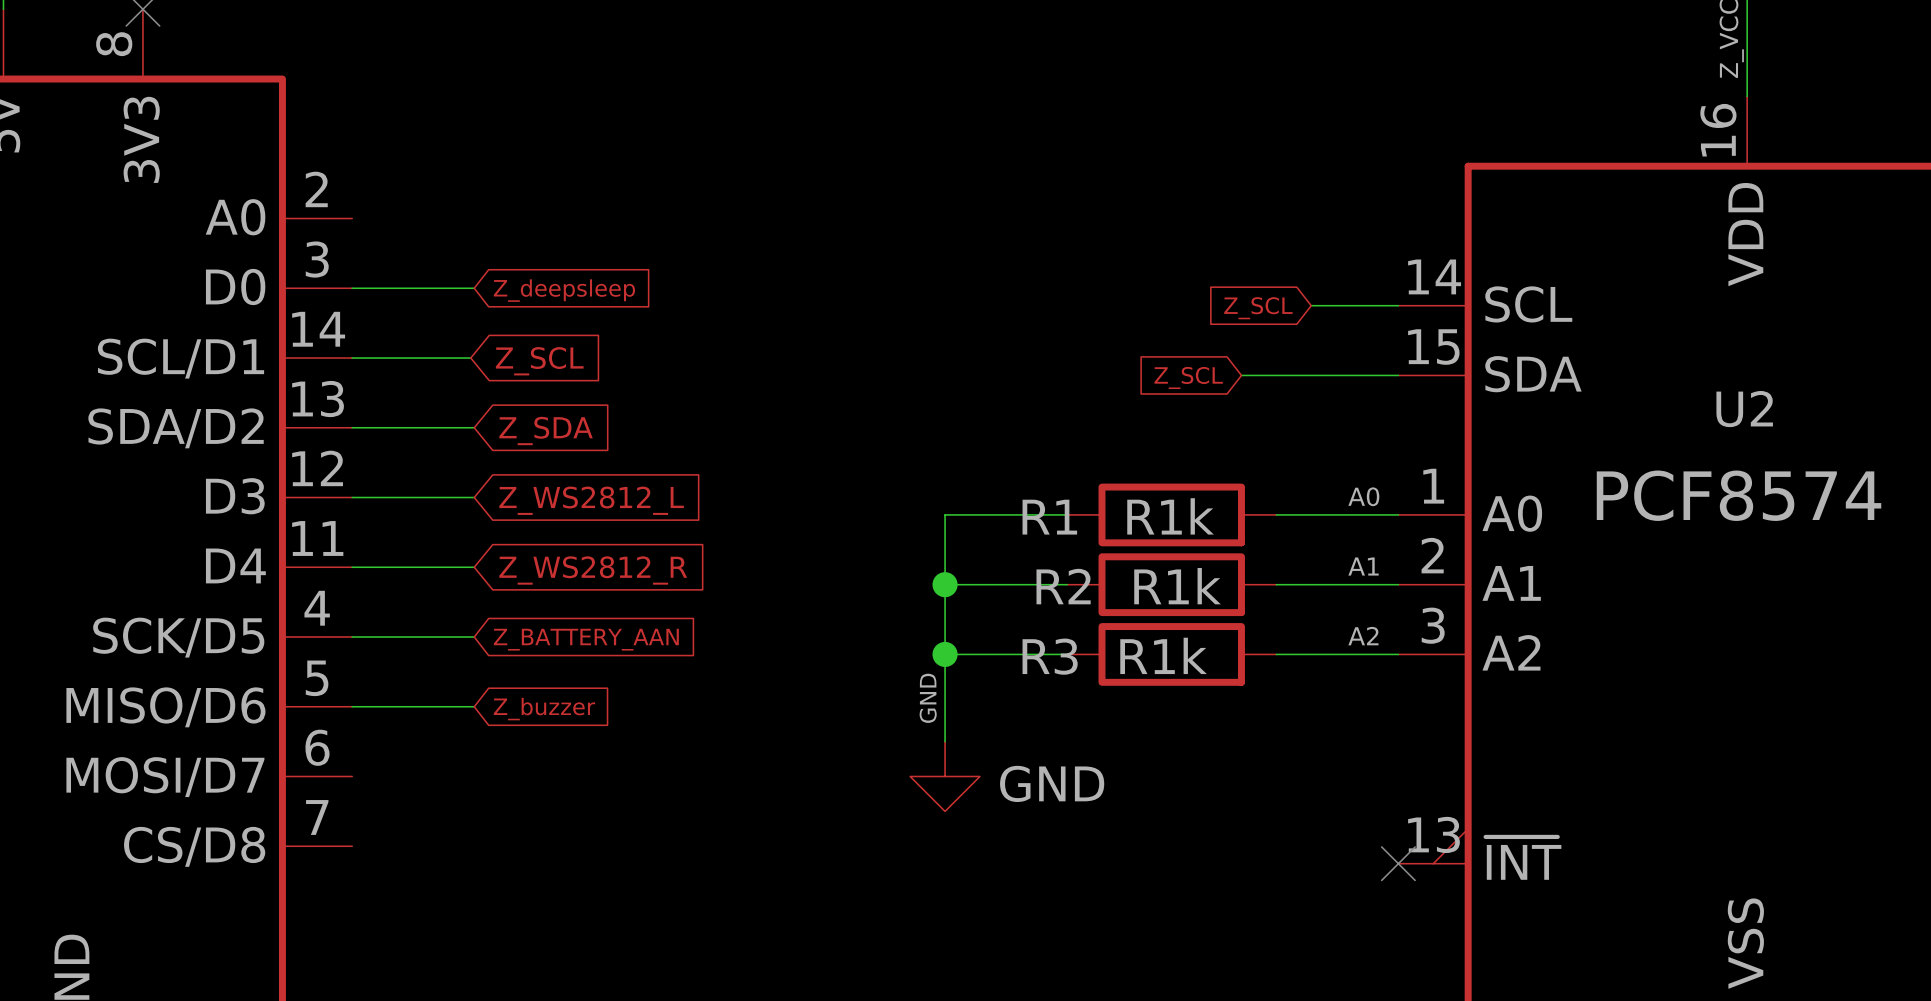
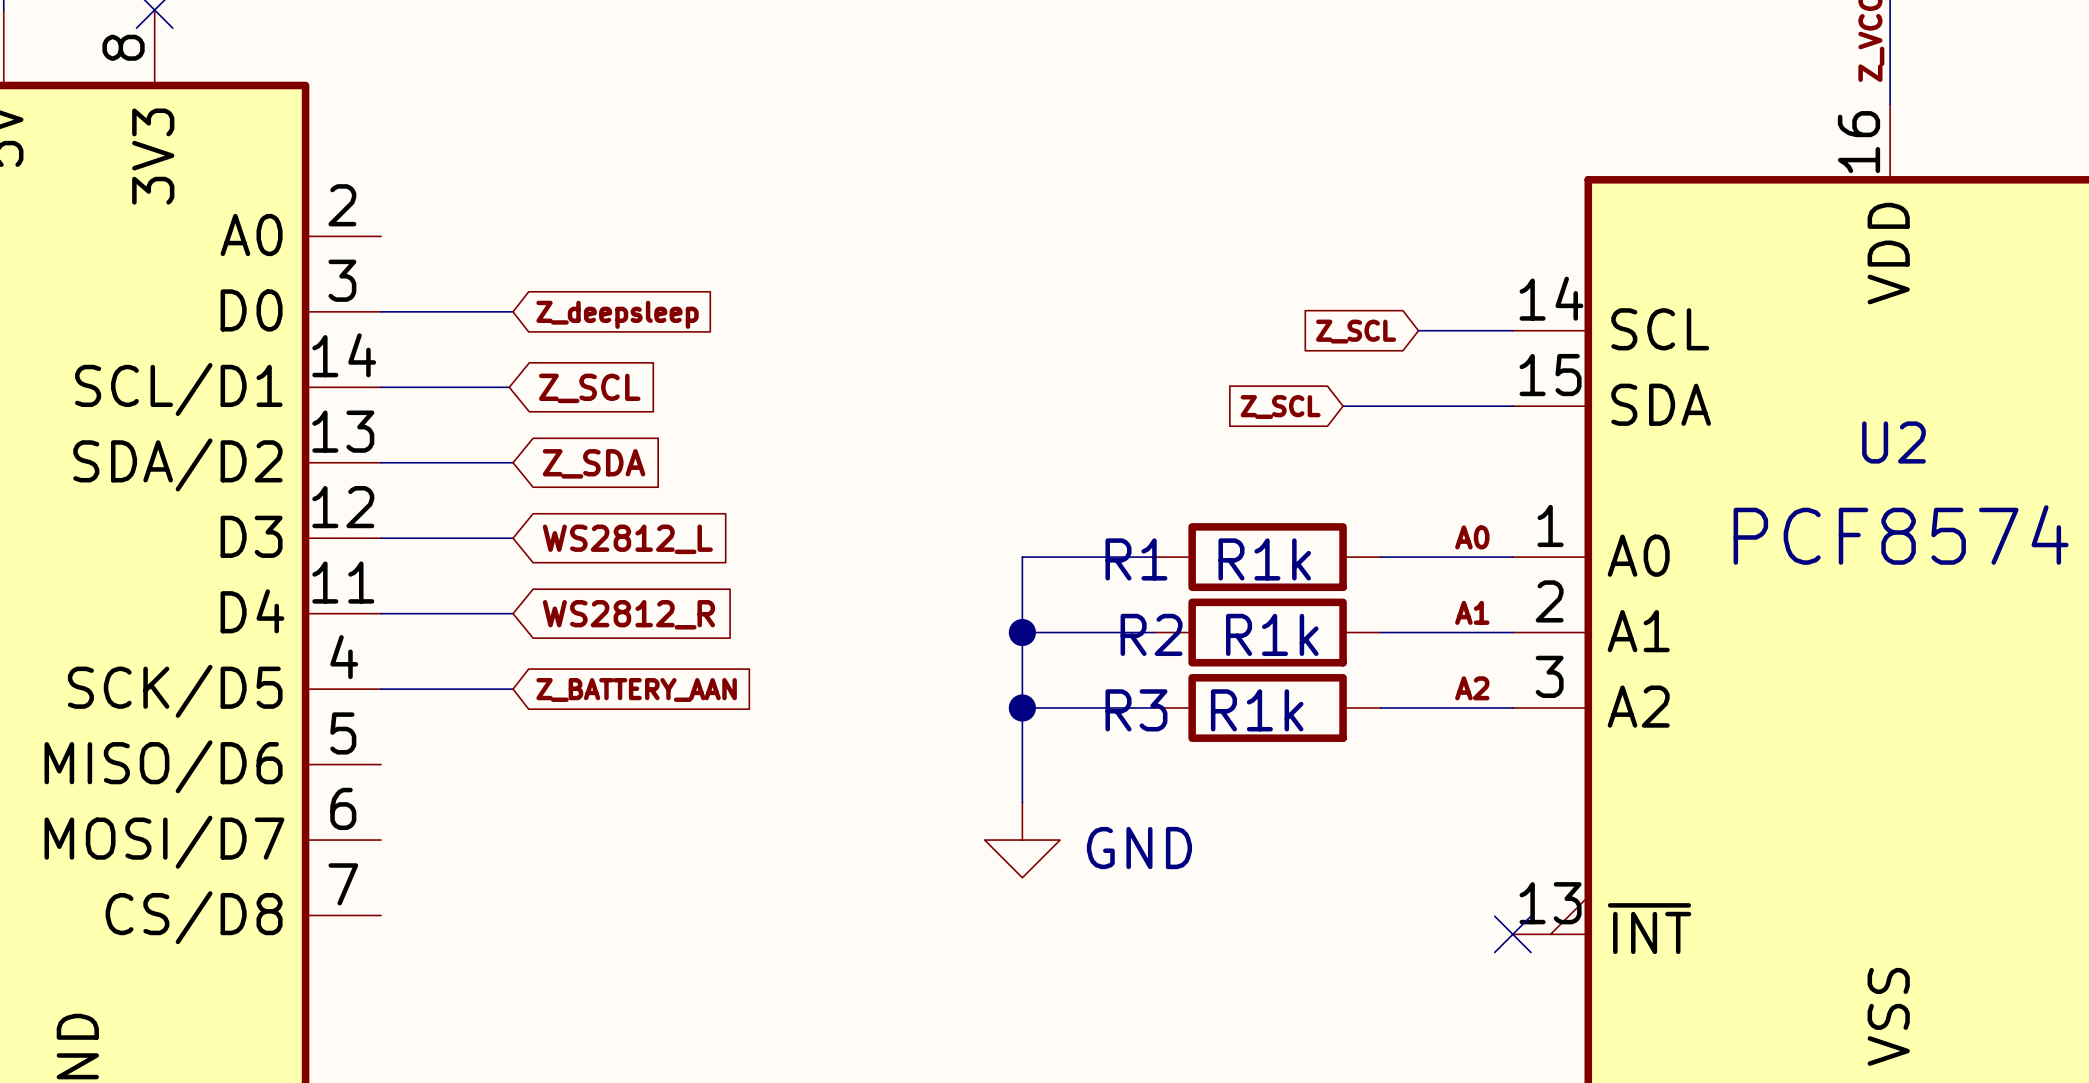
global label: Z_WS2812_L (591, 500) -> WS2812_L (627, 539)
global label: Z_WS2812_R (593, 570) -> WS2812_R (628, 614)
label: GND (928, 698) -> none
wire: (352, 706) (474, 706) -> none
global label: Z_buzzer (544, 709) -> none

